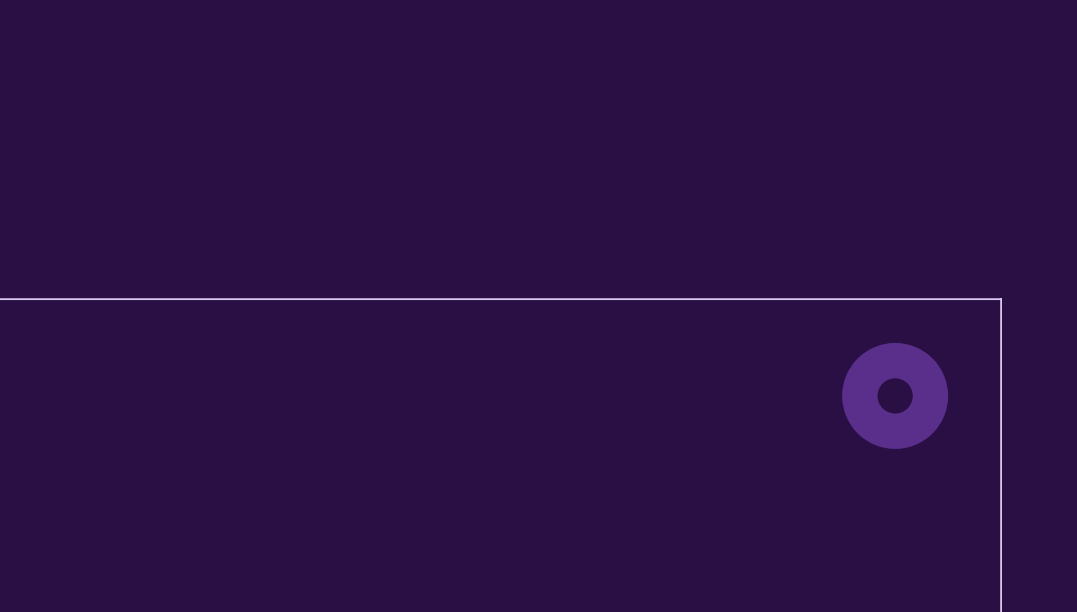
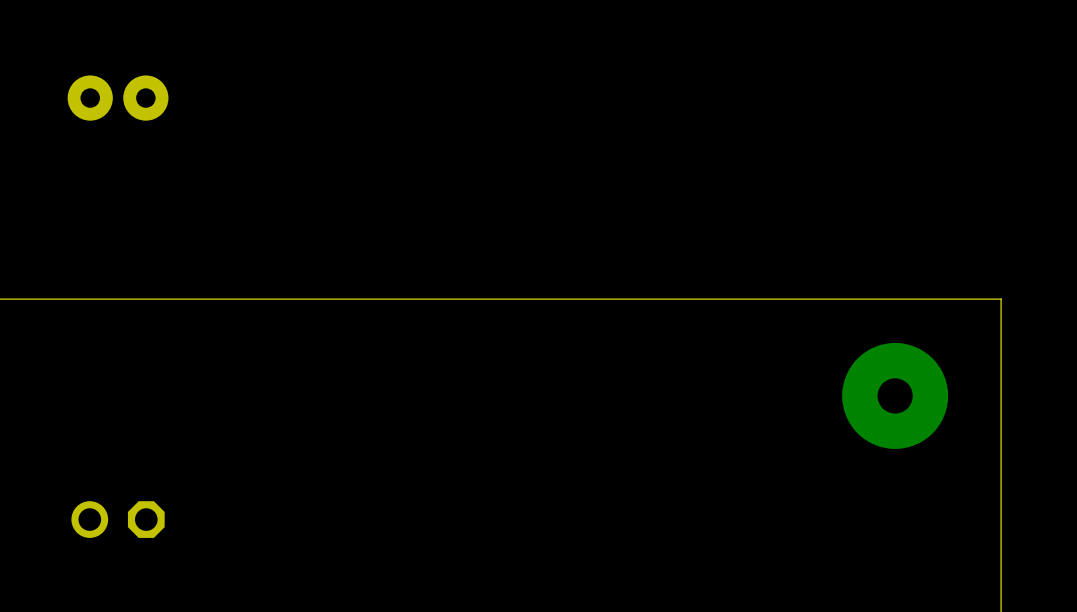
part: none -> (118, 98)
part: none -> (118, 519)

